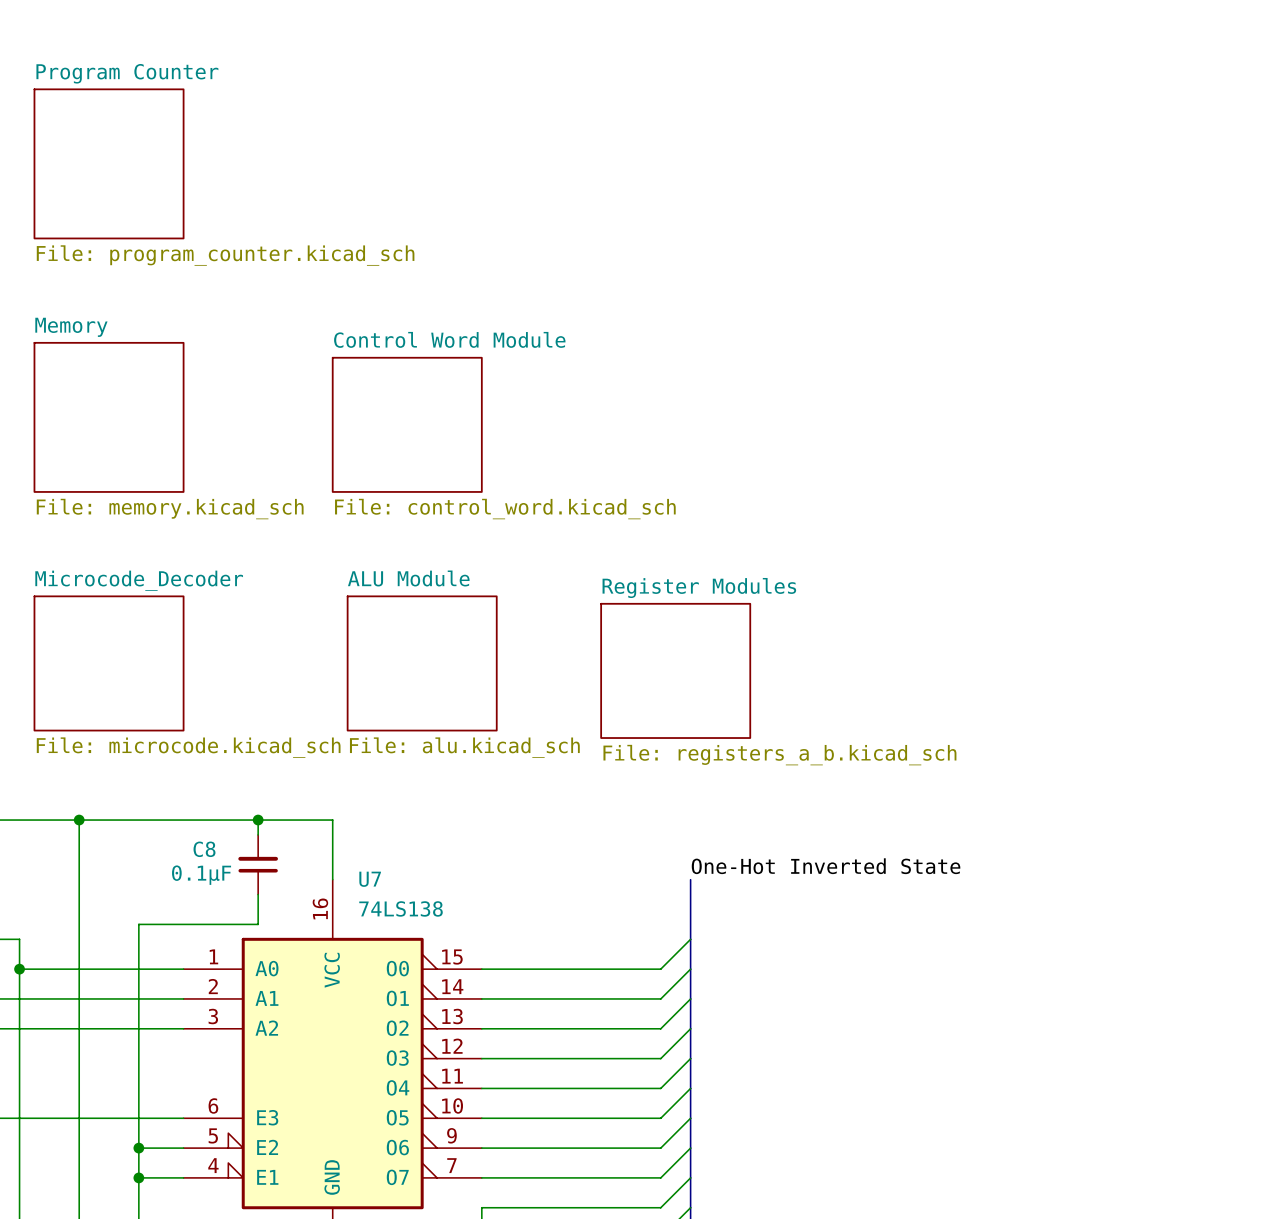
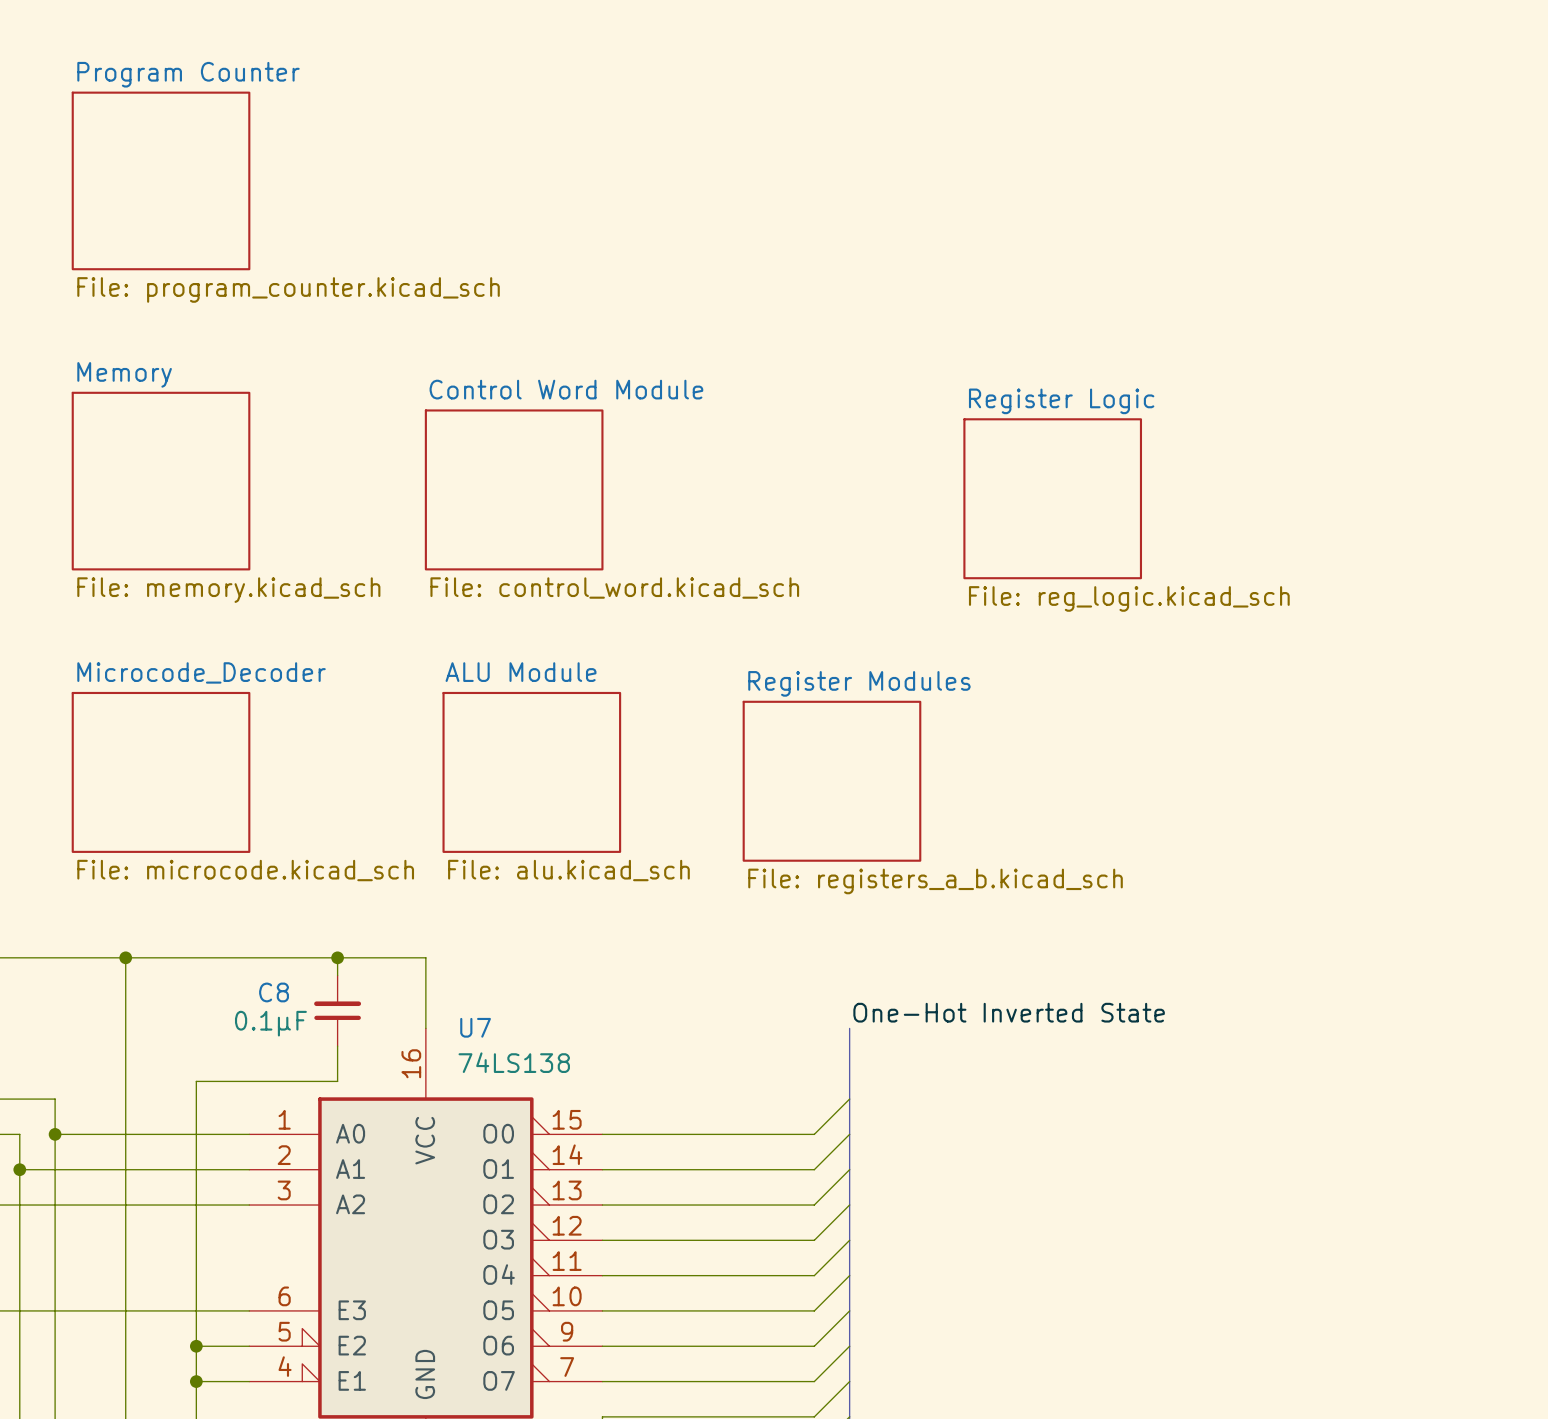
sheet Register Logic: none -> File: reg_logic.kicad_sch (1052, 498)

